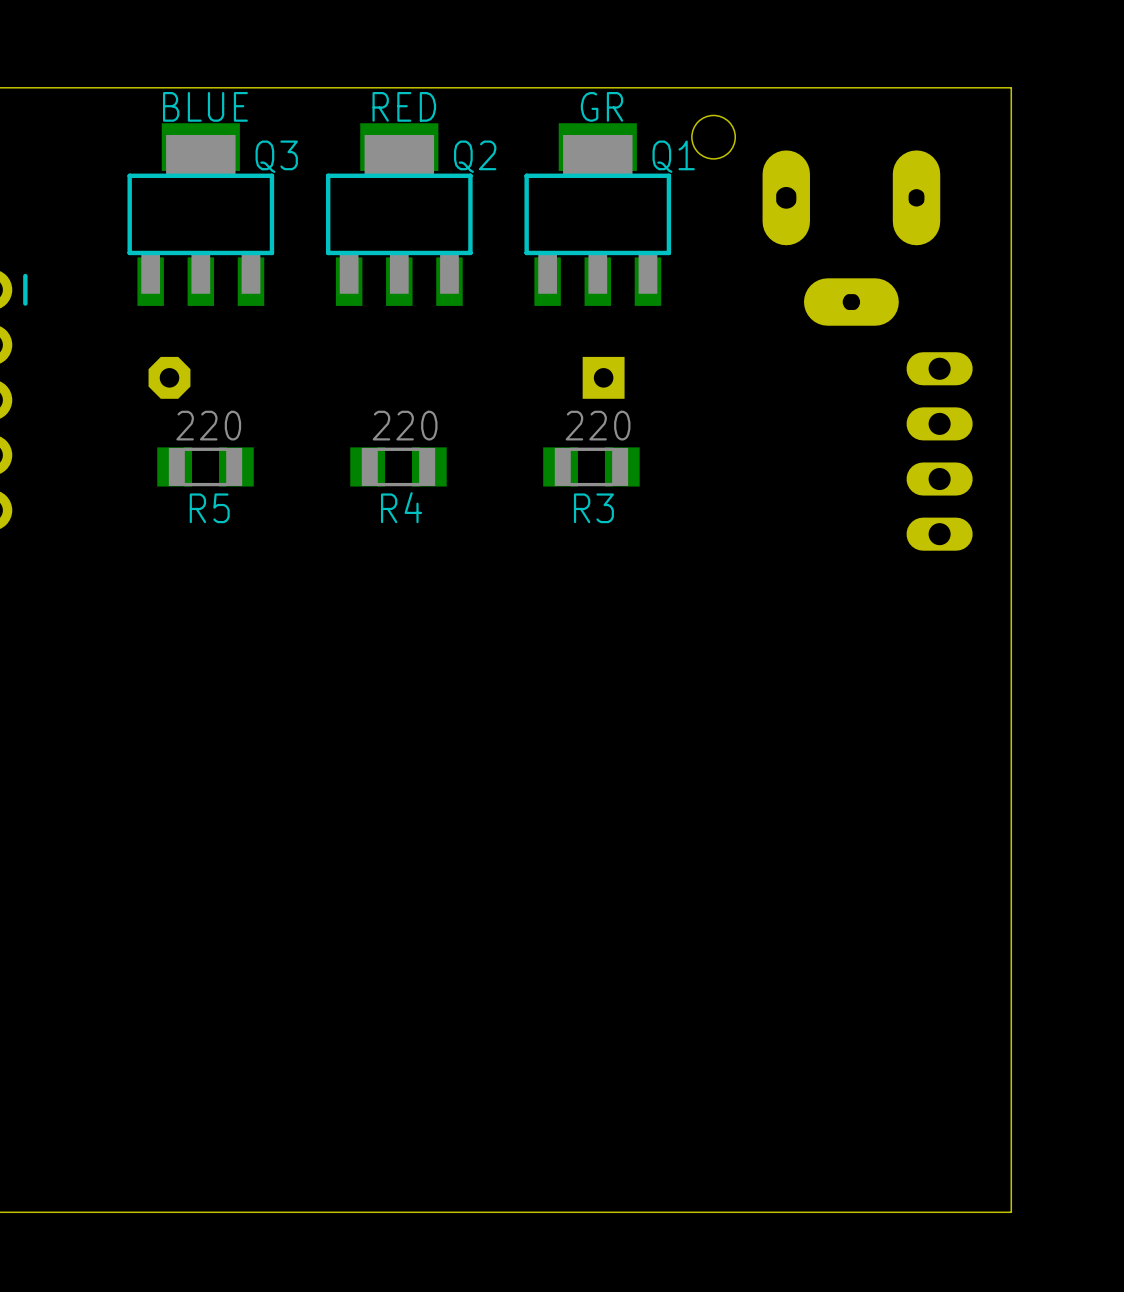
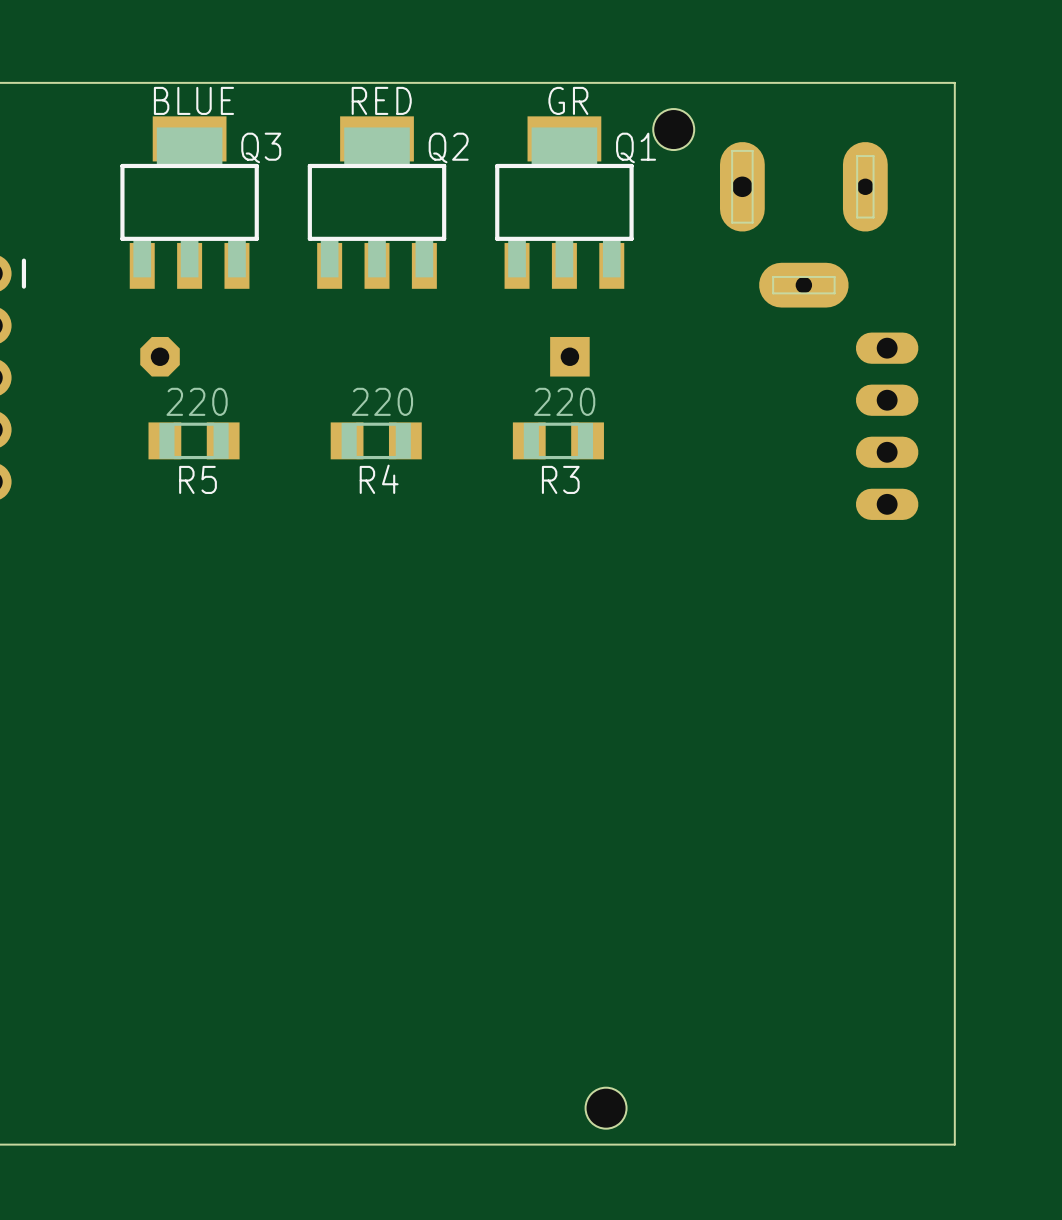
hole: none -> (606, 1108)

